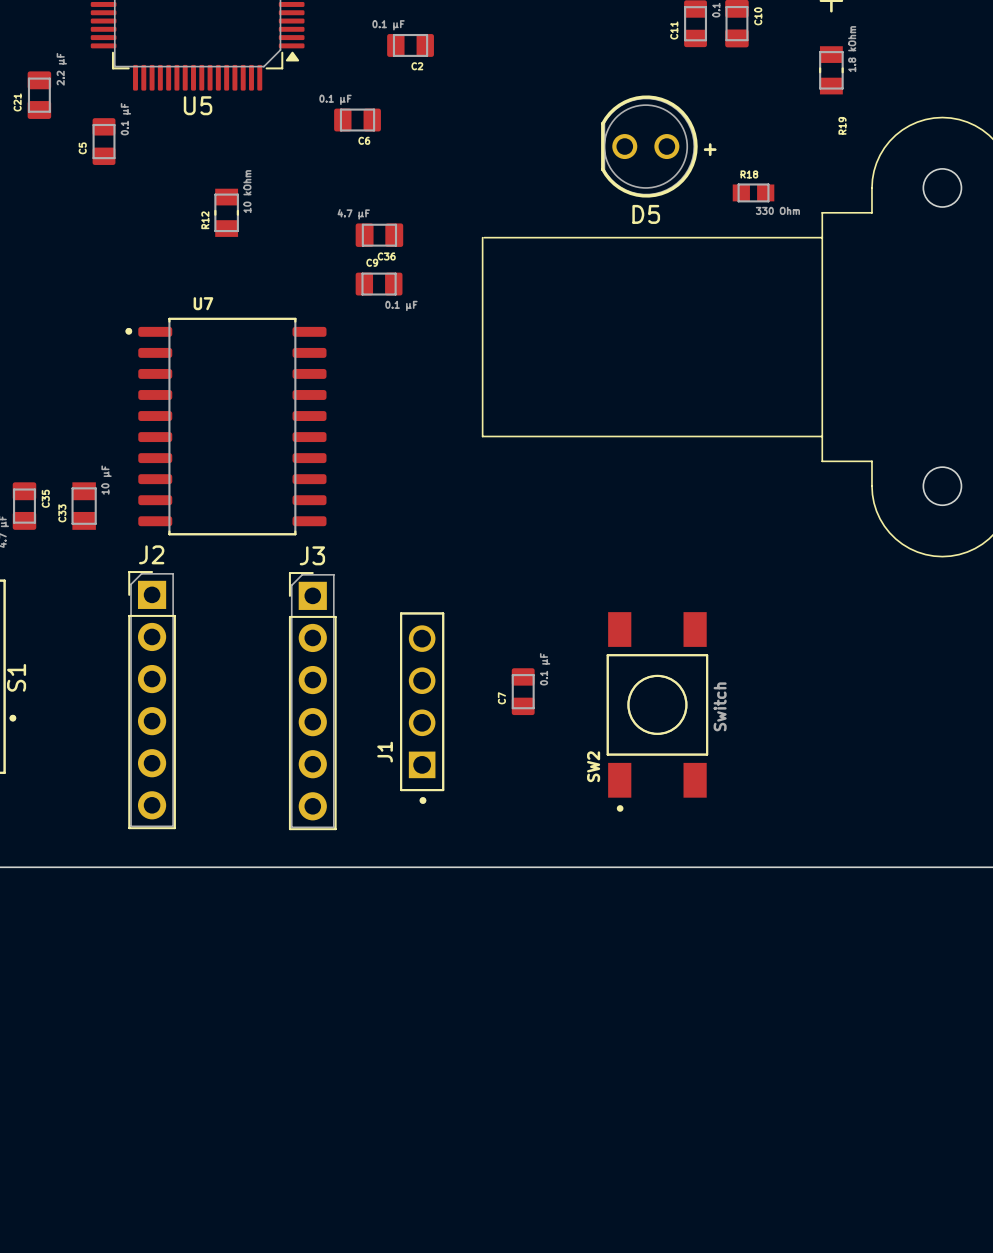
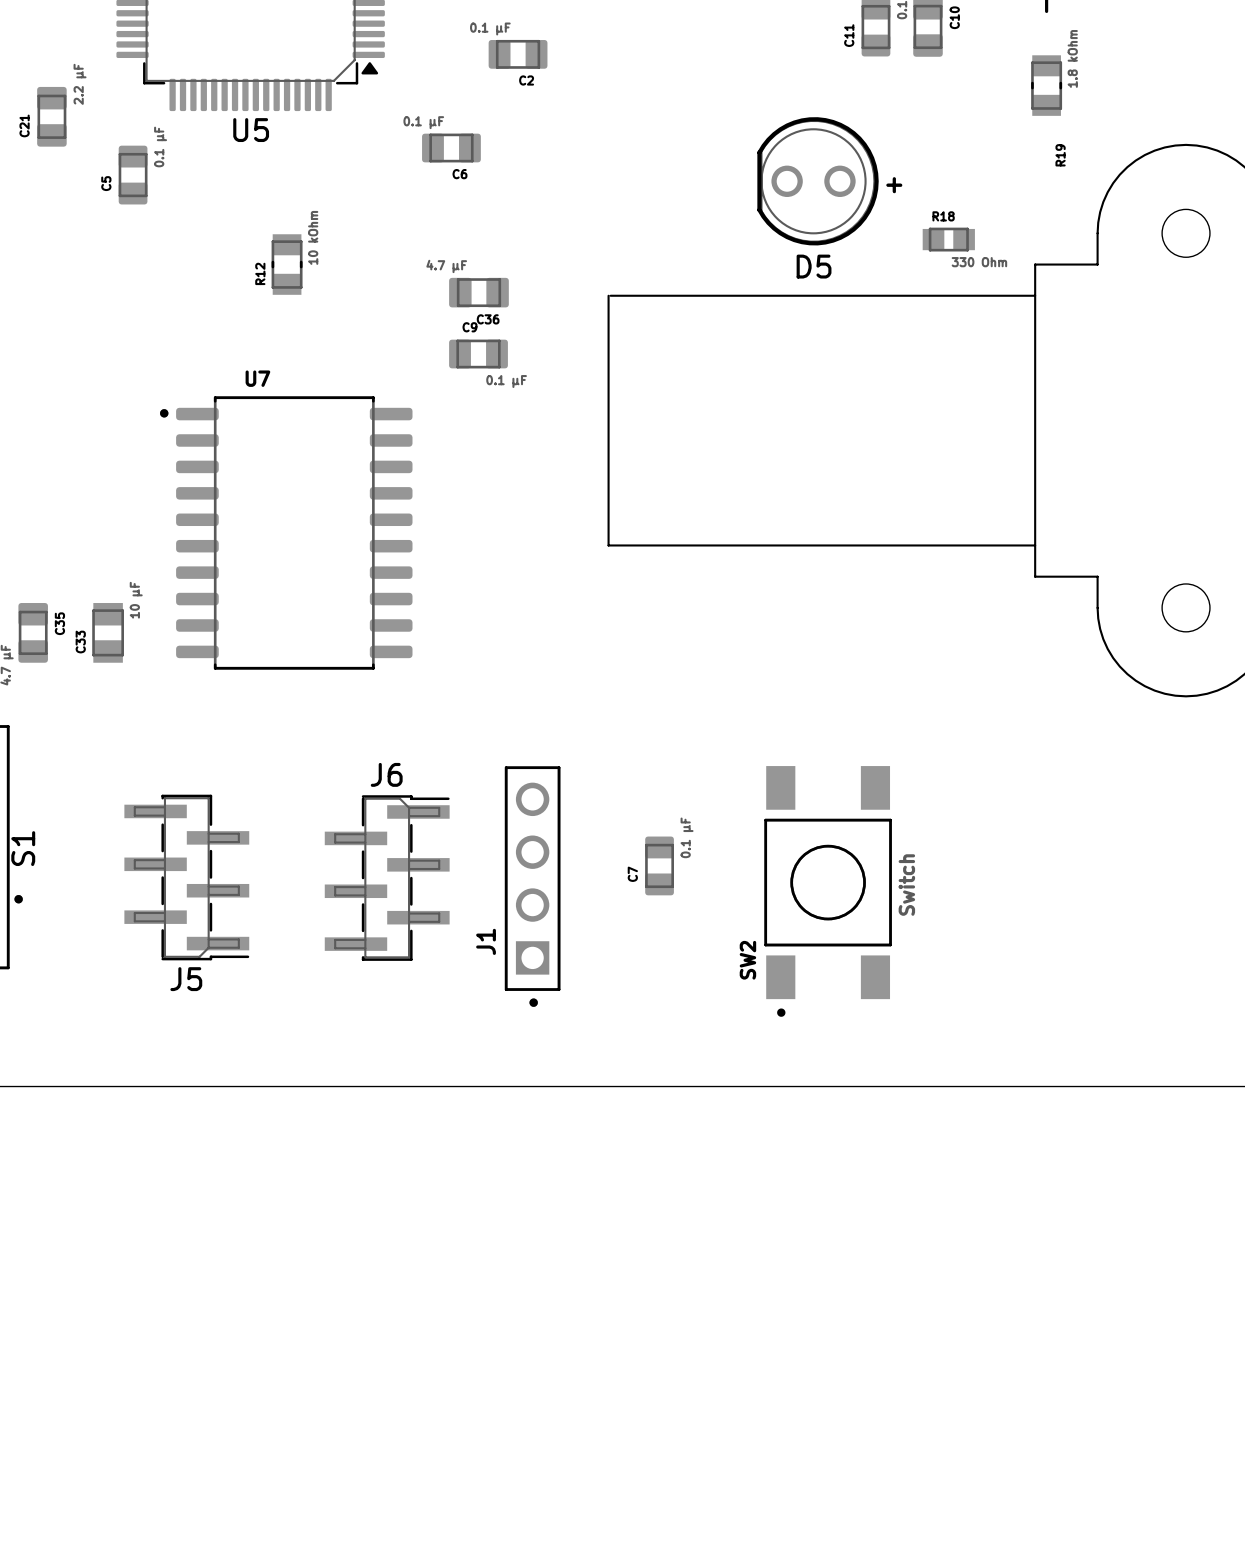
J5: none -> (186, 877)
J2: (152, 700) -> none
J6: none -> (387, 878)
J3: (312, 701) -> none

